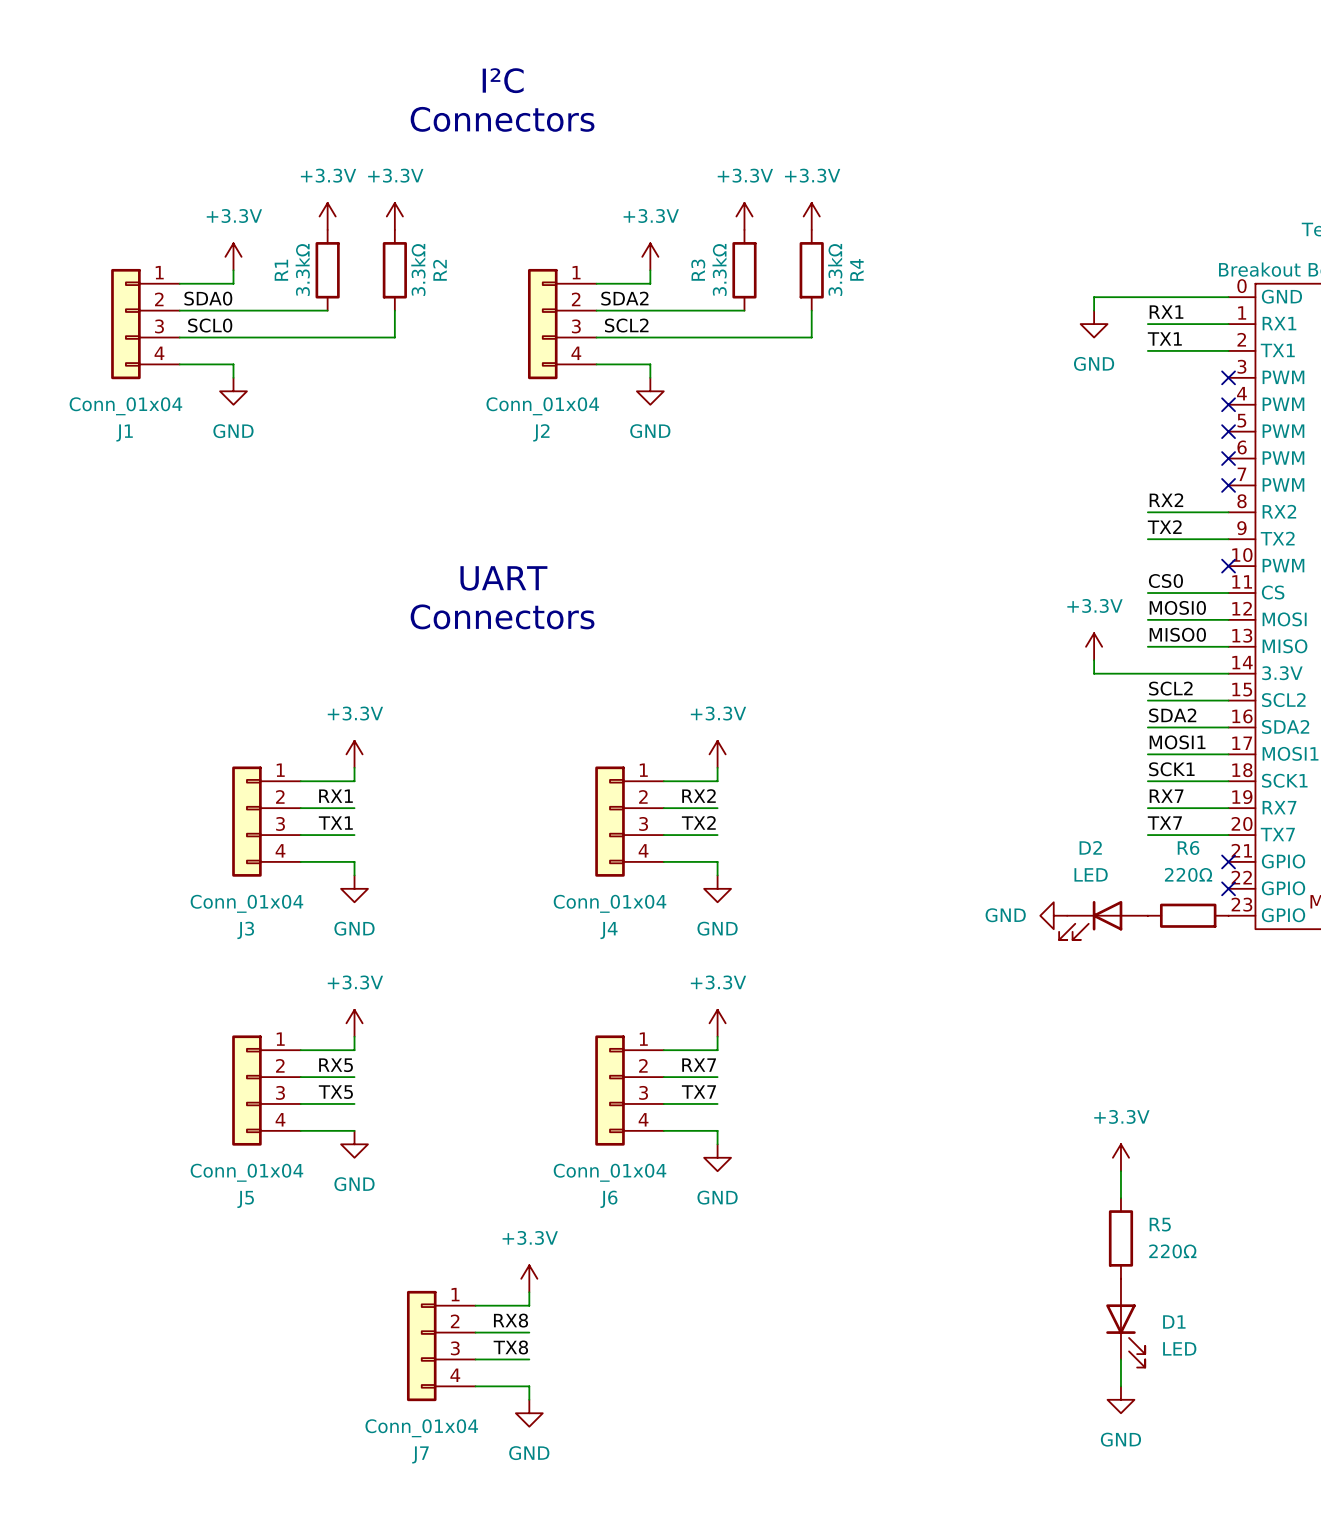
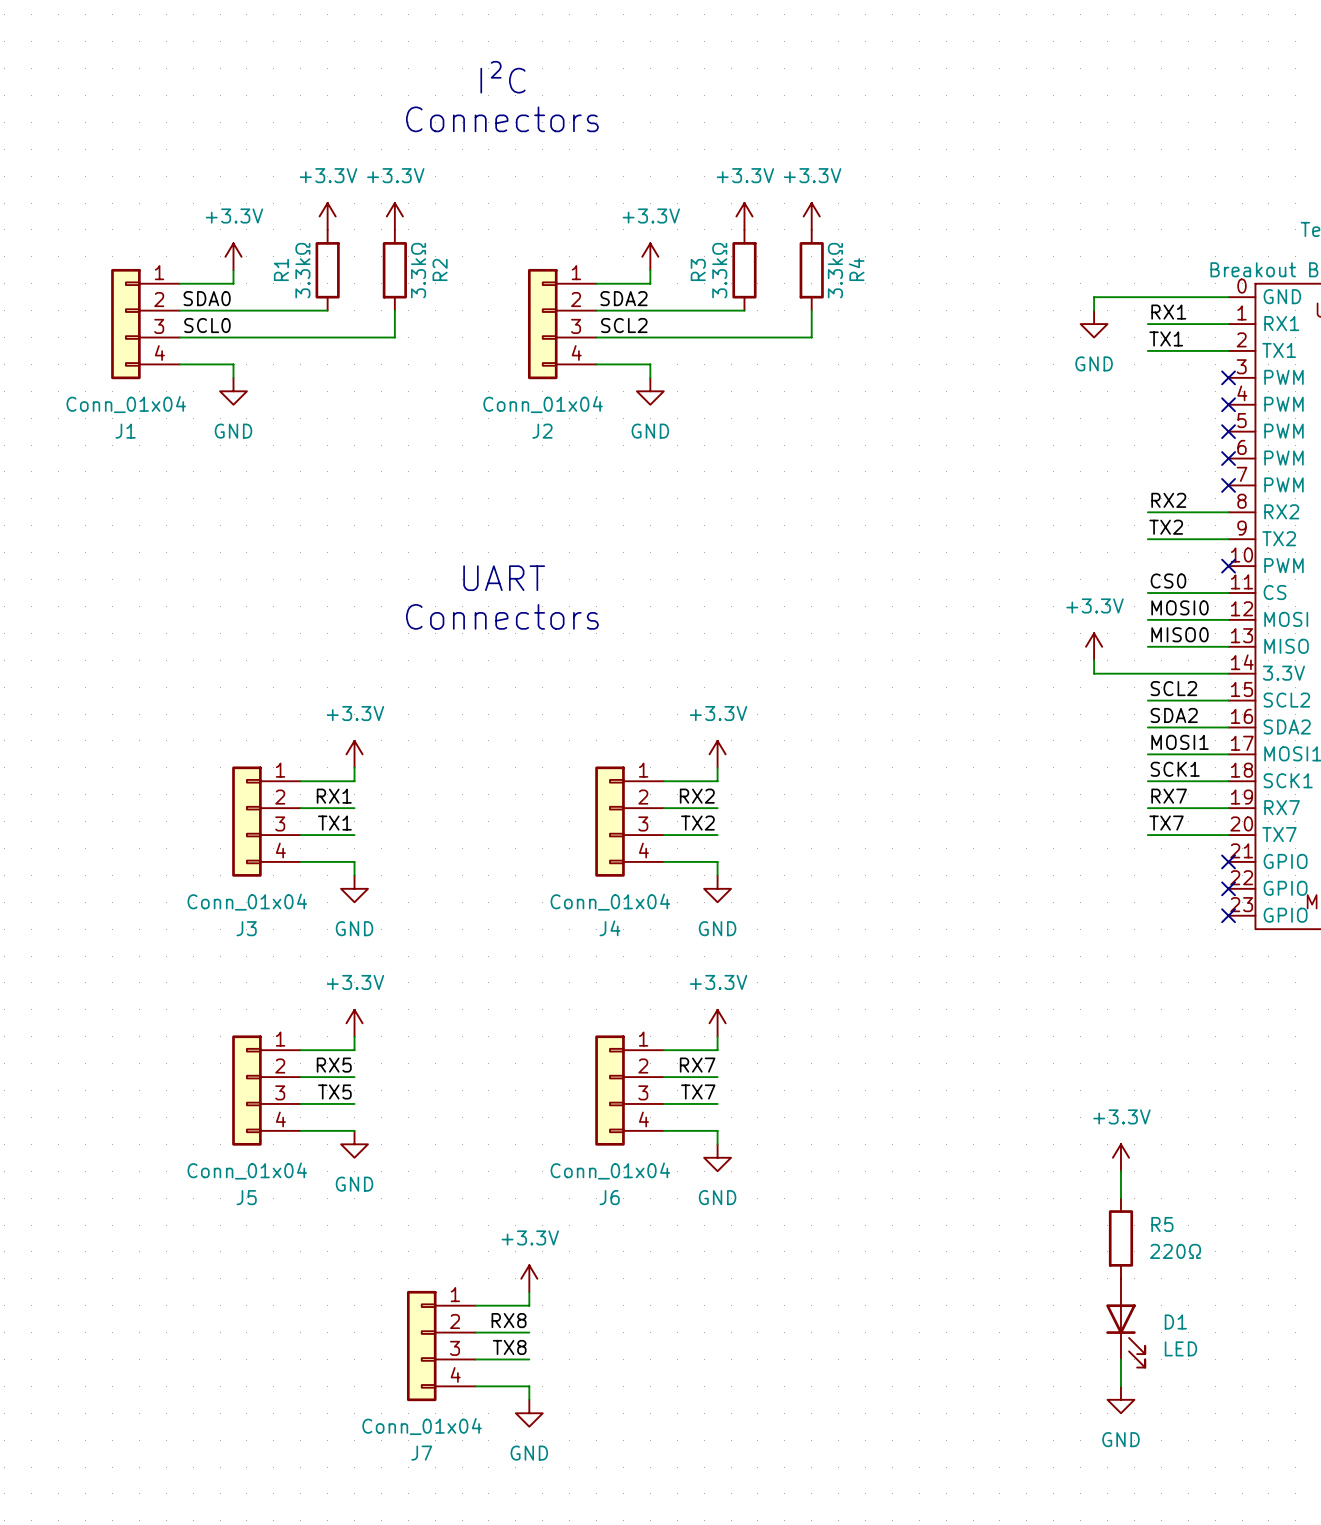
power symbol: GND (1053, 915) -> none
R6: 220Ω (1188, 915) -> none
no-connect mark: none -> (1228, 915)
D2: LED (1103, 920) -> none

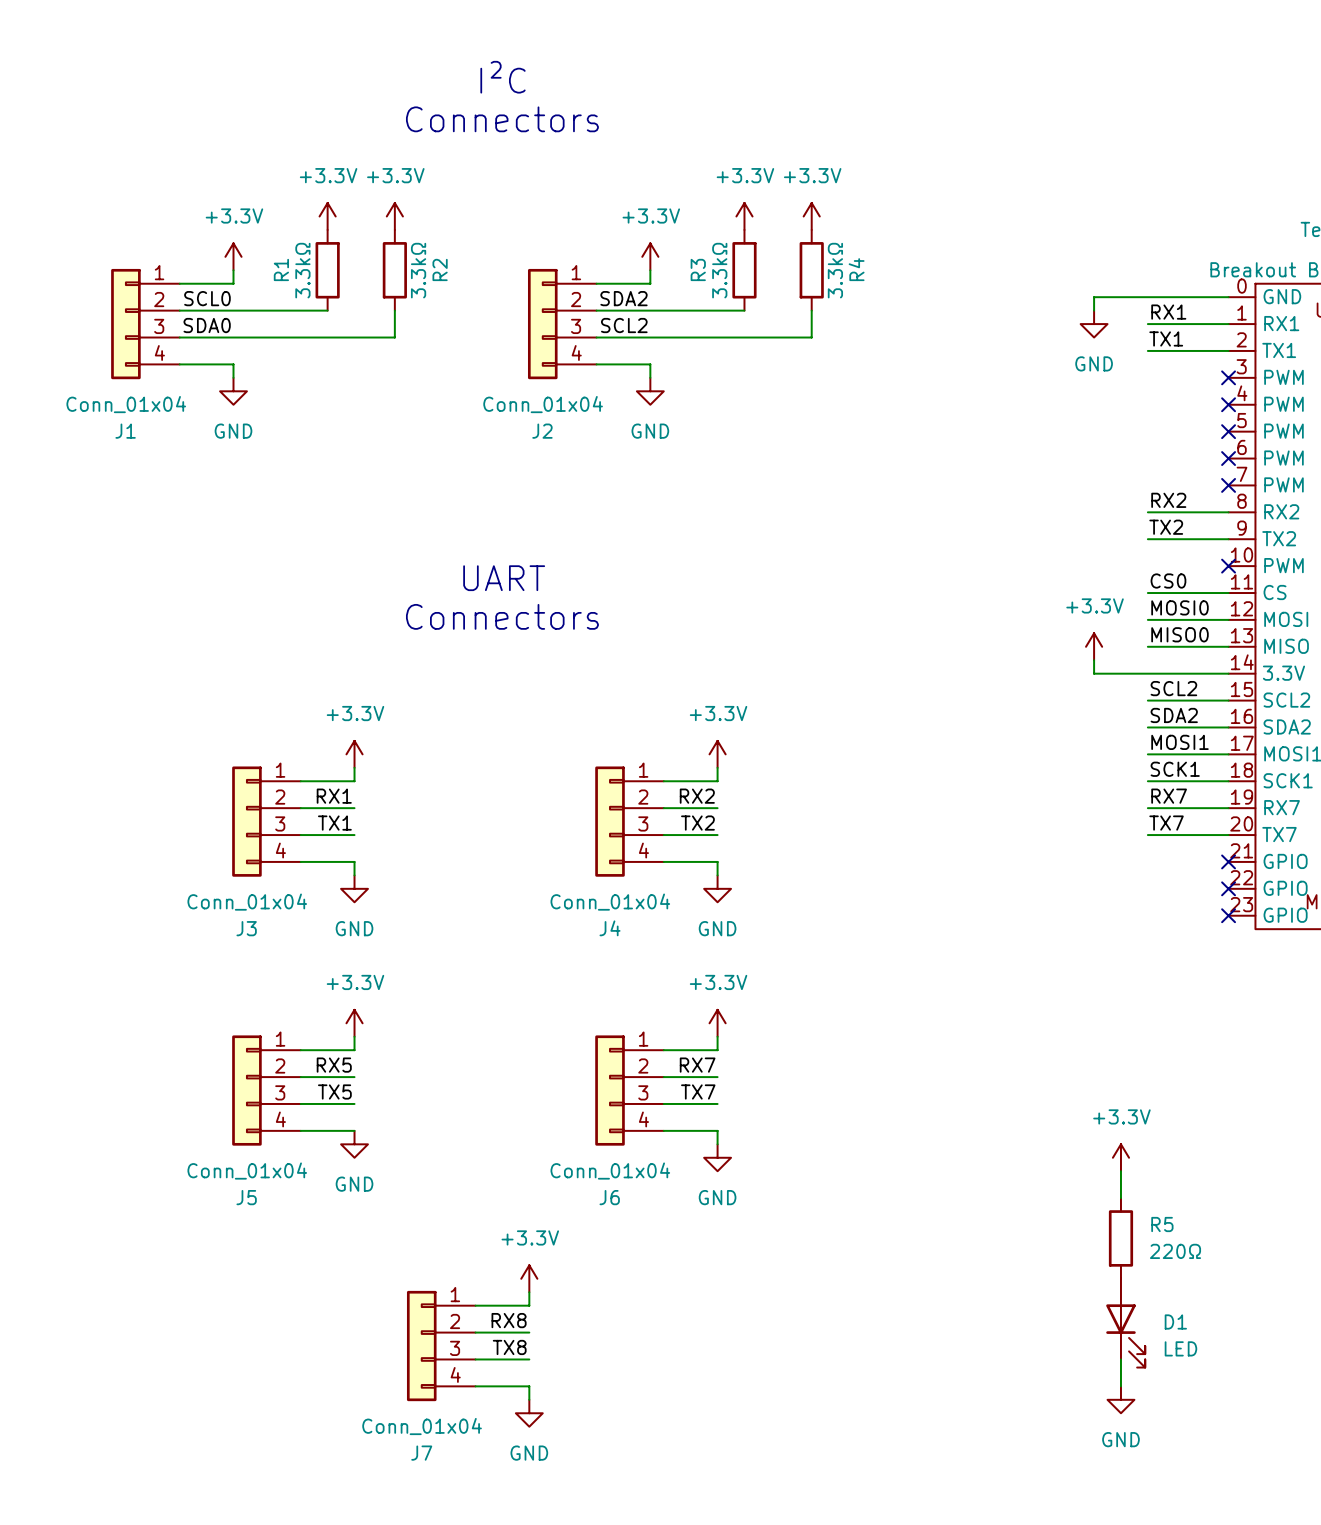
label: SDA0 (207, 298) -> SCL0 (207, 298)
label: SCL0 (207, 325) -> SDA0 (207, 325)

